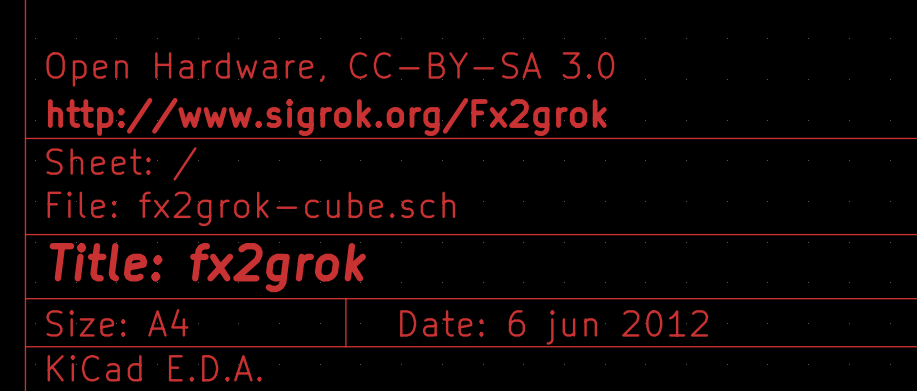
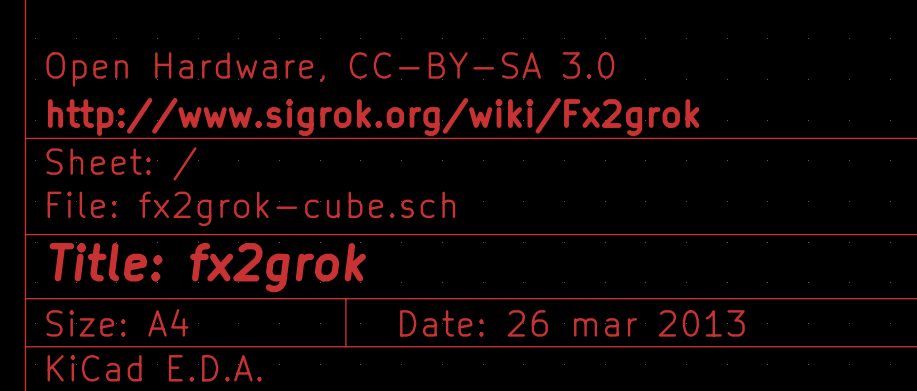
title block: http://www.sigrok.org/Fx2grok (327, 116) -> http://www.sigrok.org/wiki/Fx2grok (373, 116)
title block: Date: 6 jun 2012 (554, 327) -> Date: 26 mar 2013 (572, 323)

